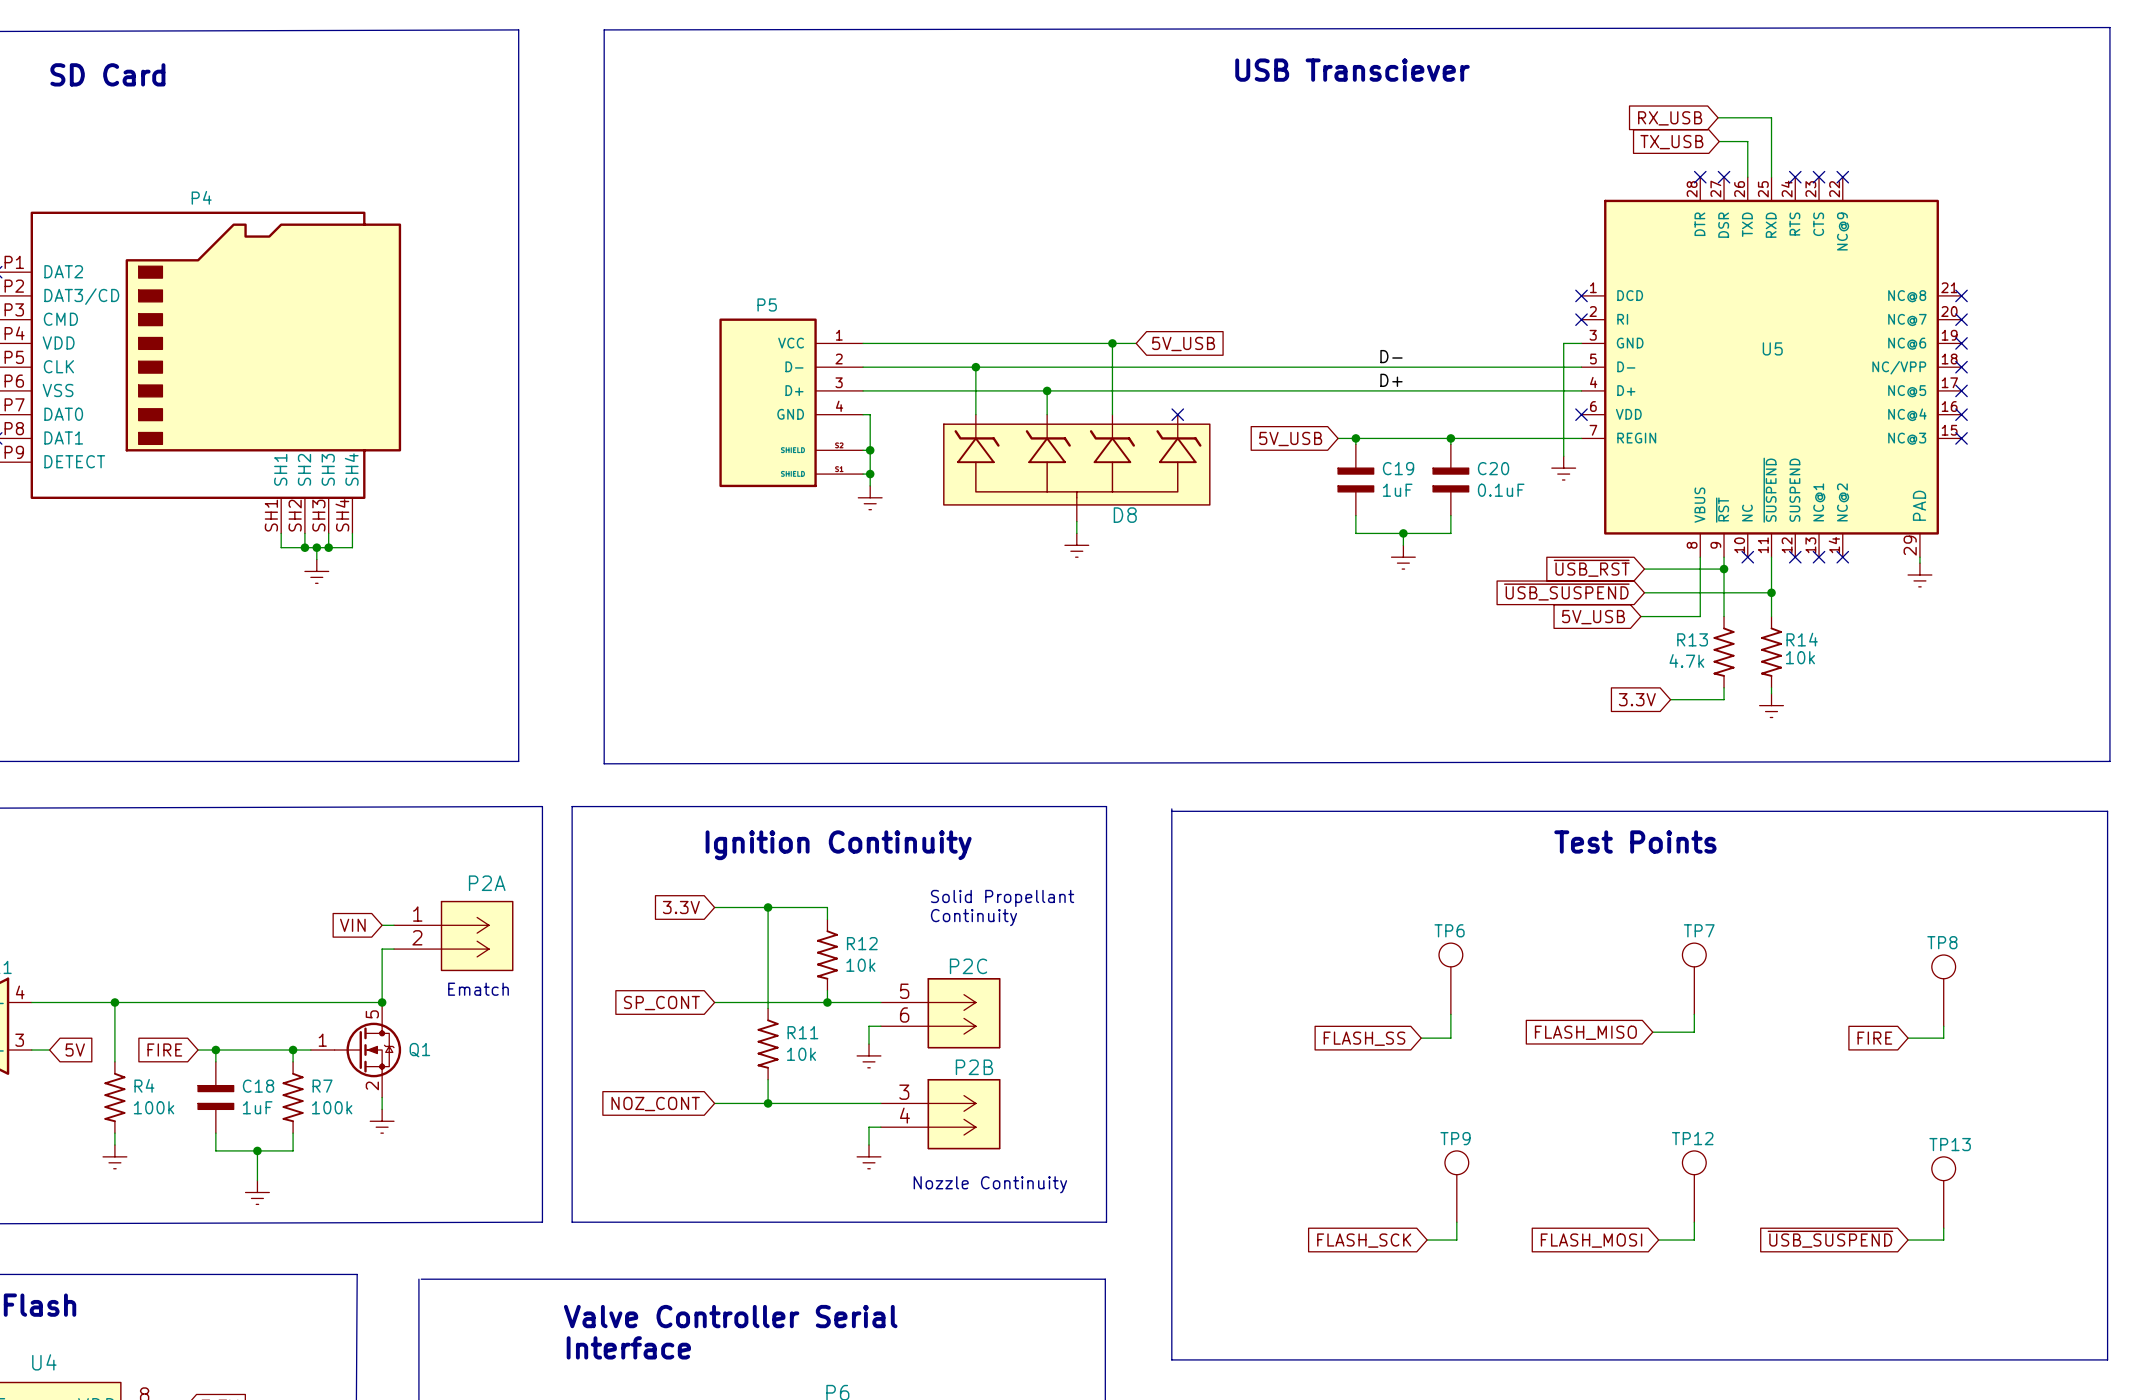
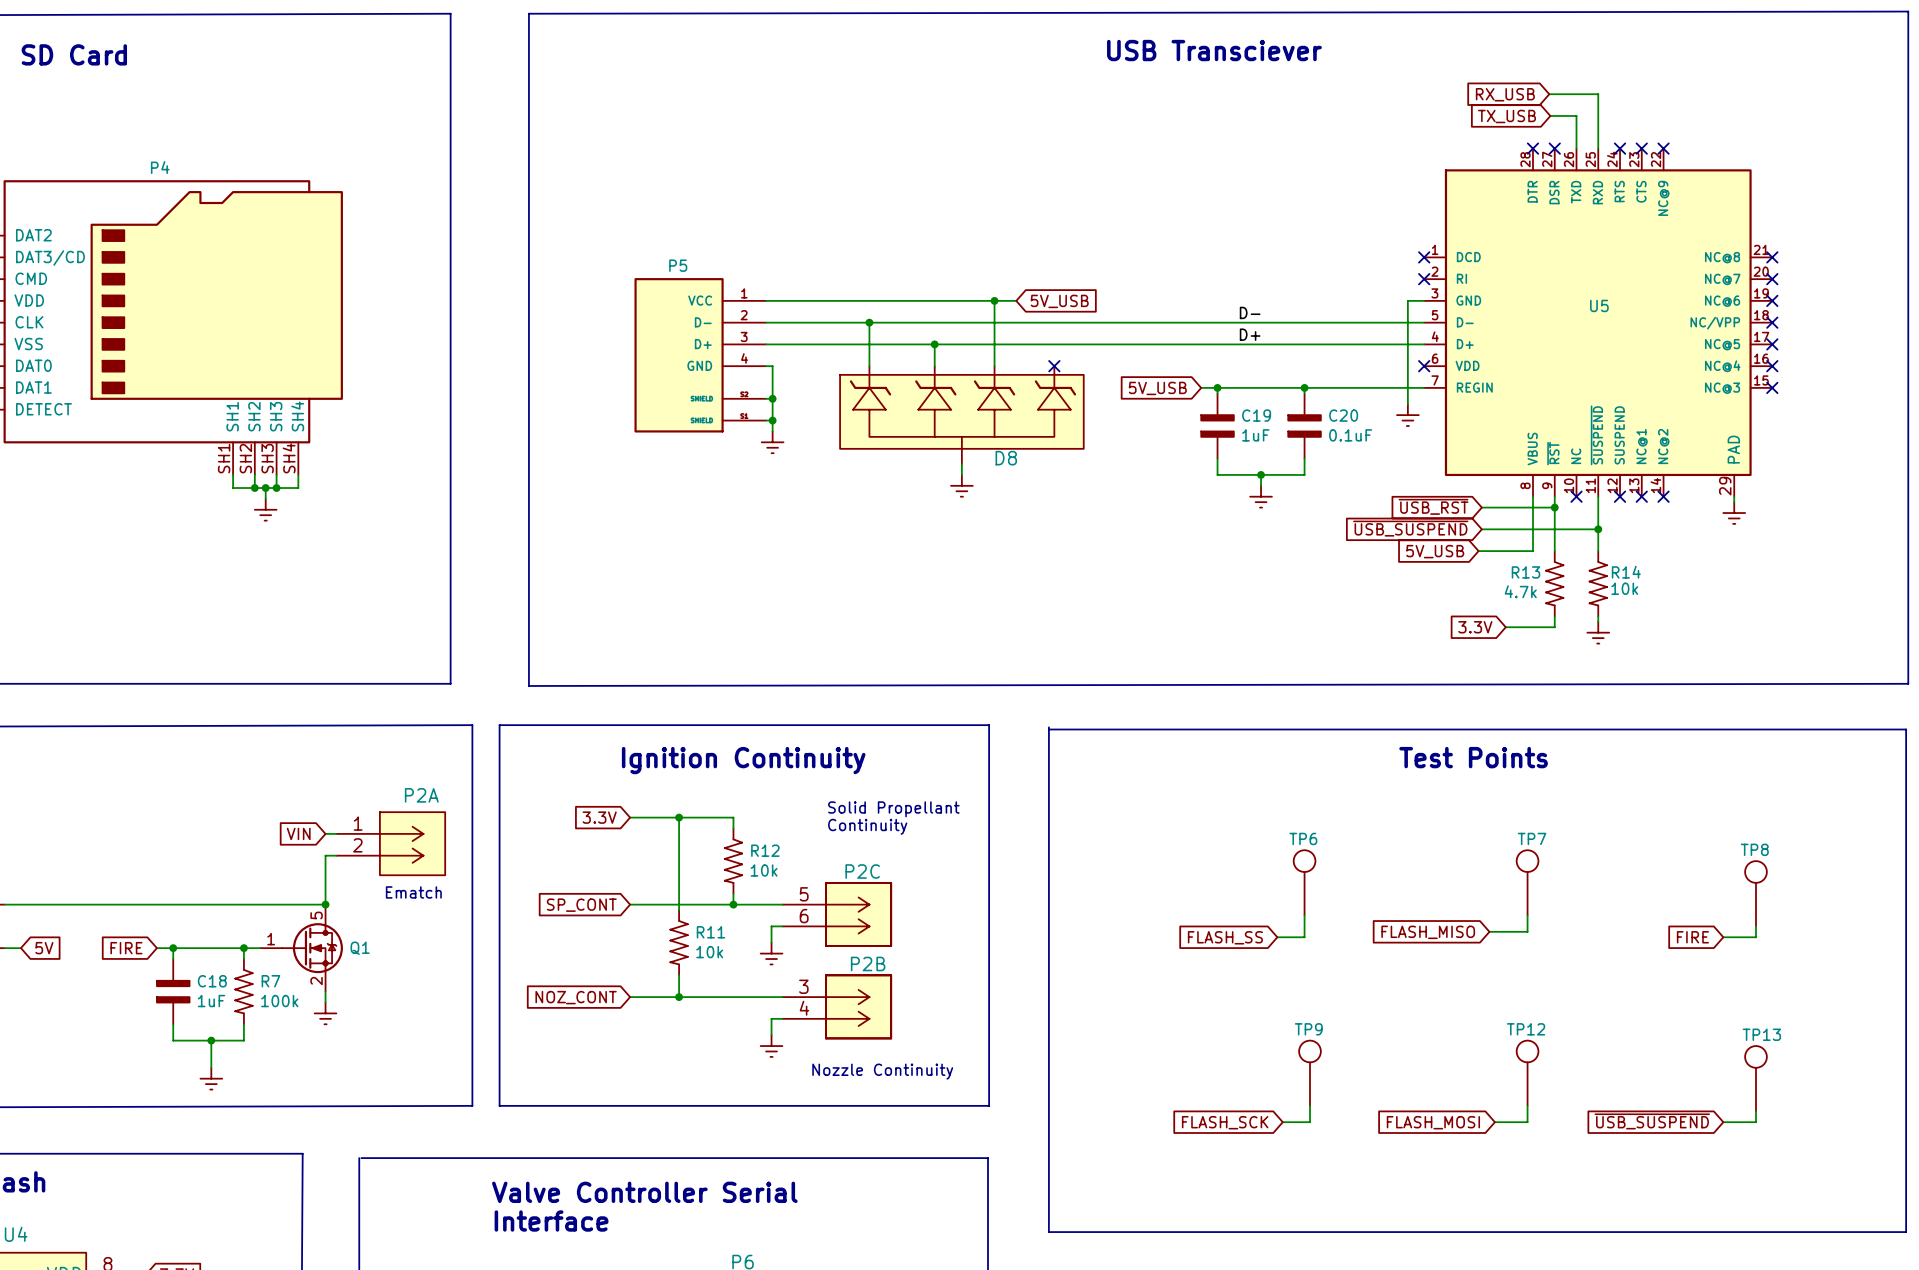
wire: (114, 1002) (114, 1061) -> none
junction: (114, 1002) -> none
R4: 100k (114, 1097) -> none
wire: (114, 1133) (114, 1145) -> none
power symbol: (114, 1156) -> none

